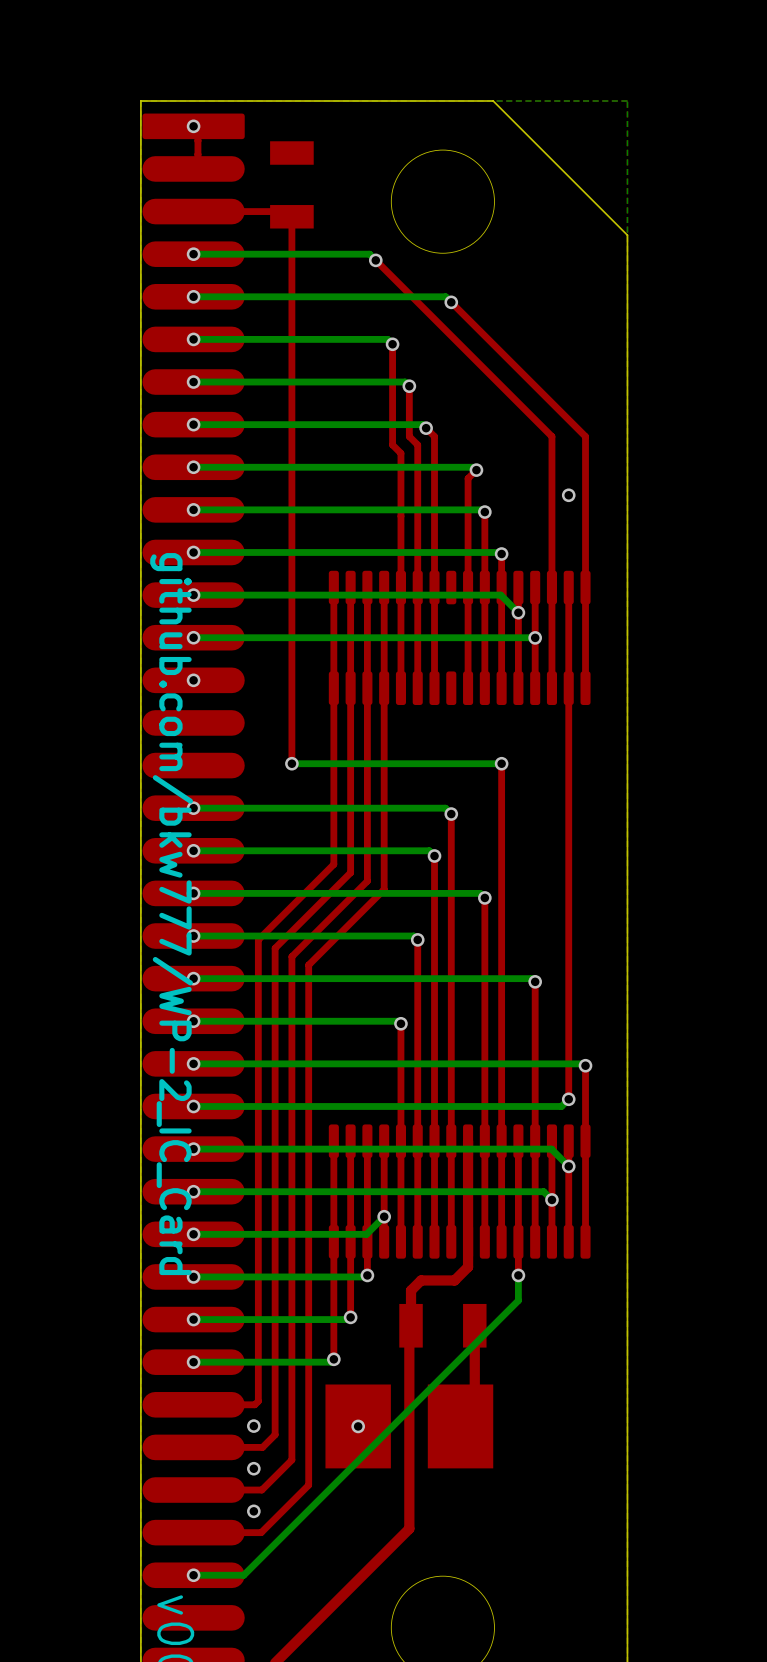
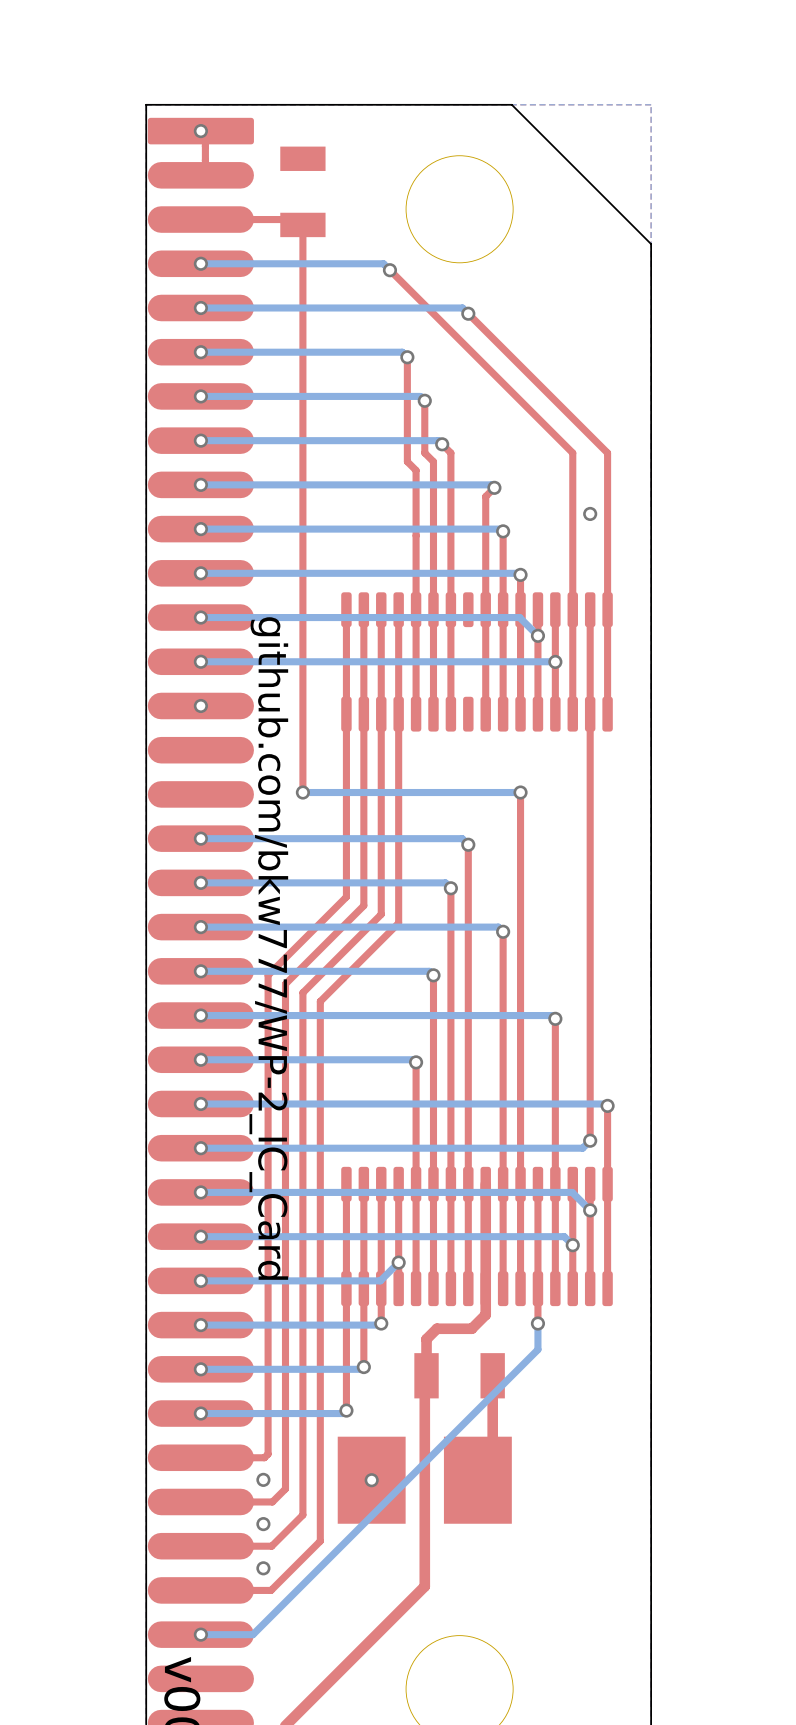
text position: github.com/bkw777/WP-2_IC_Card (171, 914) -> github.com/bkw777/WP-2_IC_Card (268, 948)

